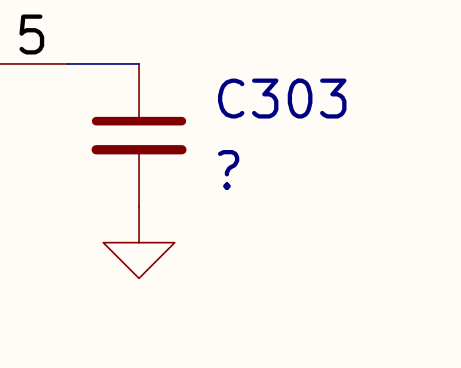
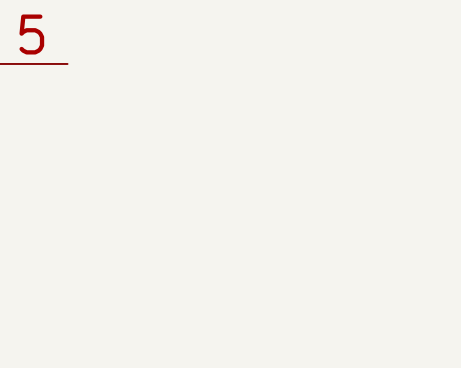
wire: (67, 63) (139, 63) -> none
C303: ? (139, 135) -> none
power symbol: (139, 242) -> none

